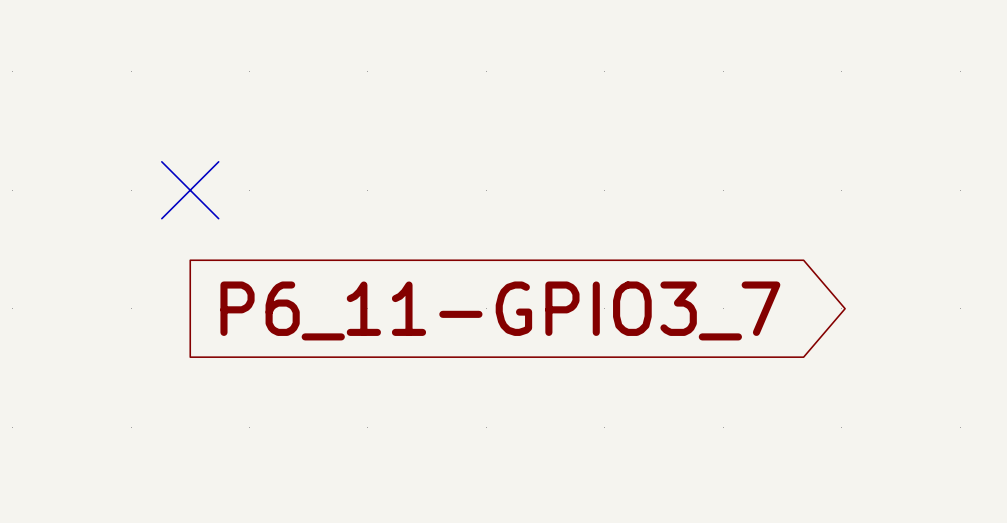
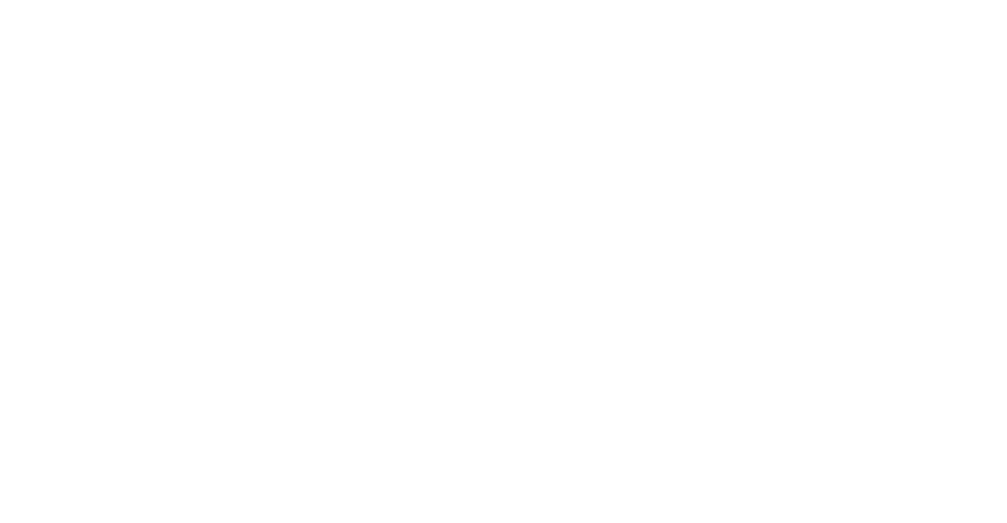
no-connect mark: (190, 190) -> none
global label: P6_11-GPIO3_7 (500, 310) -> none

